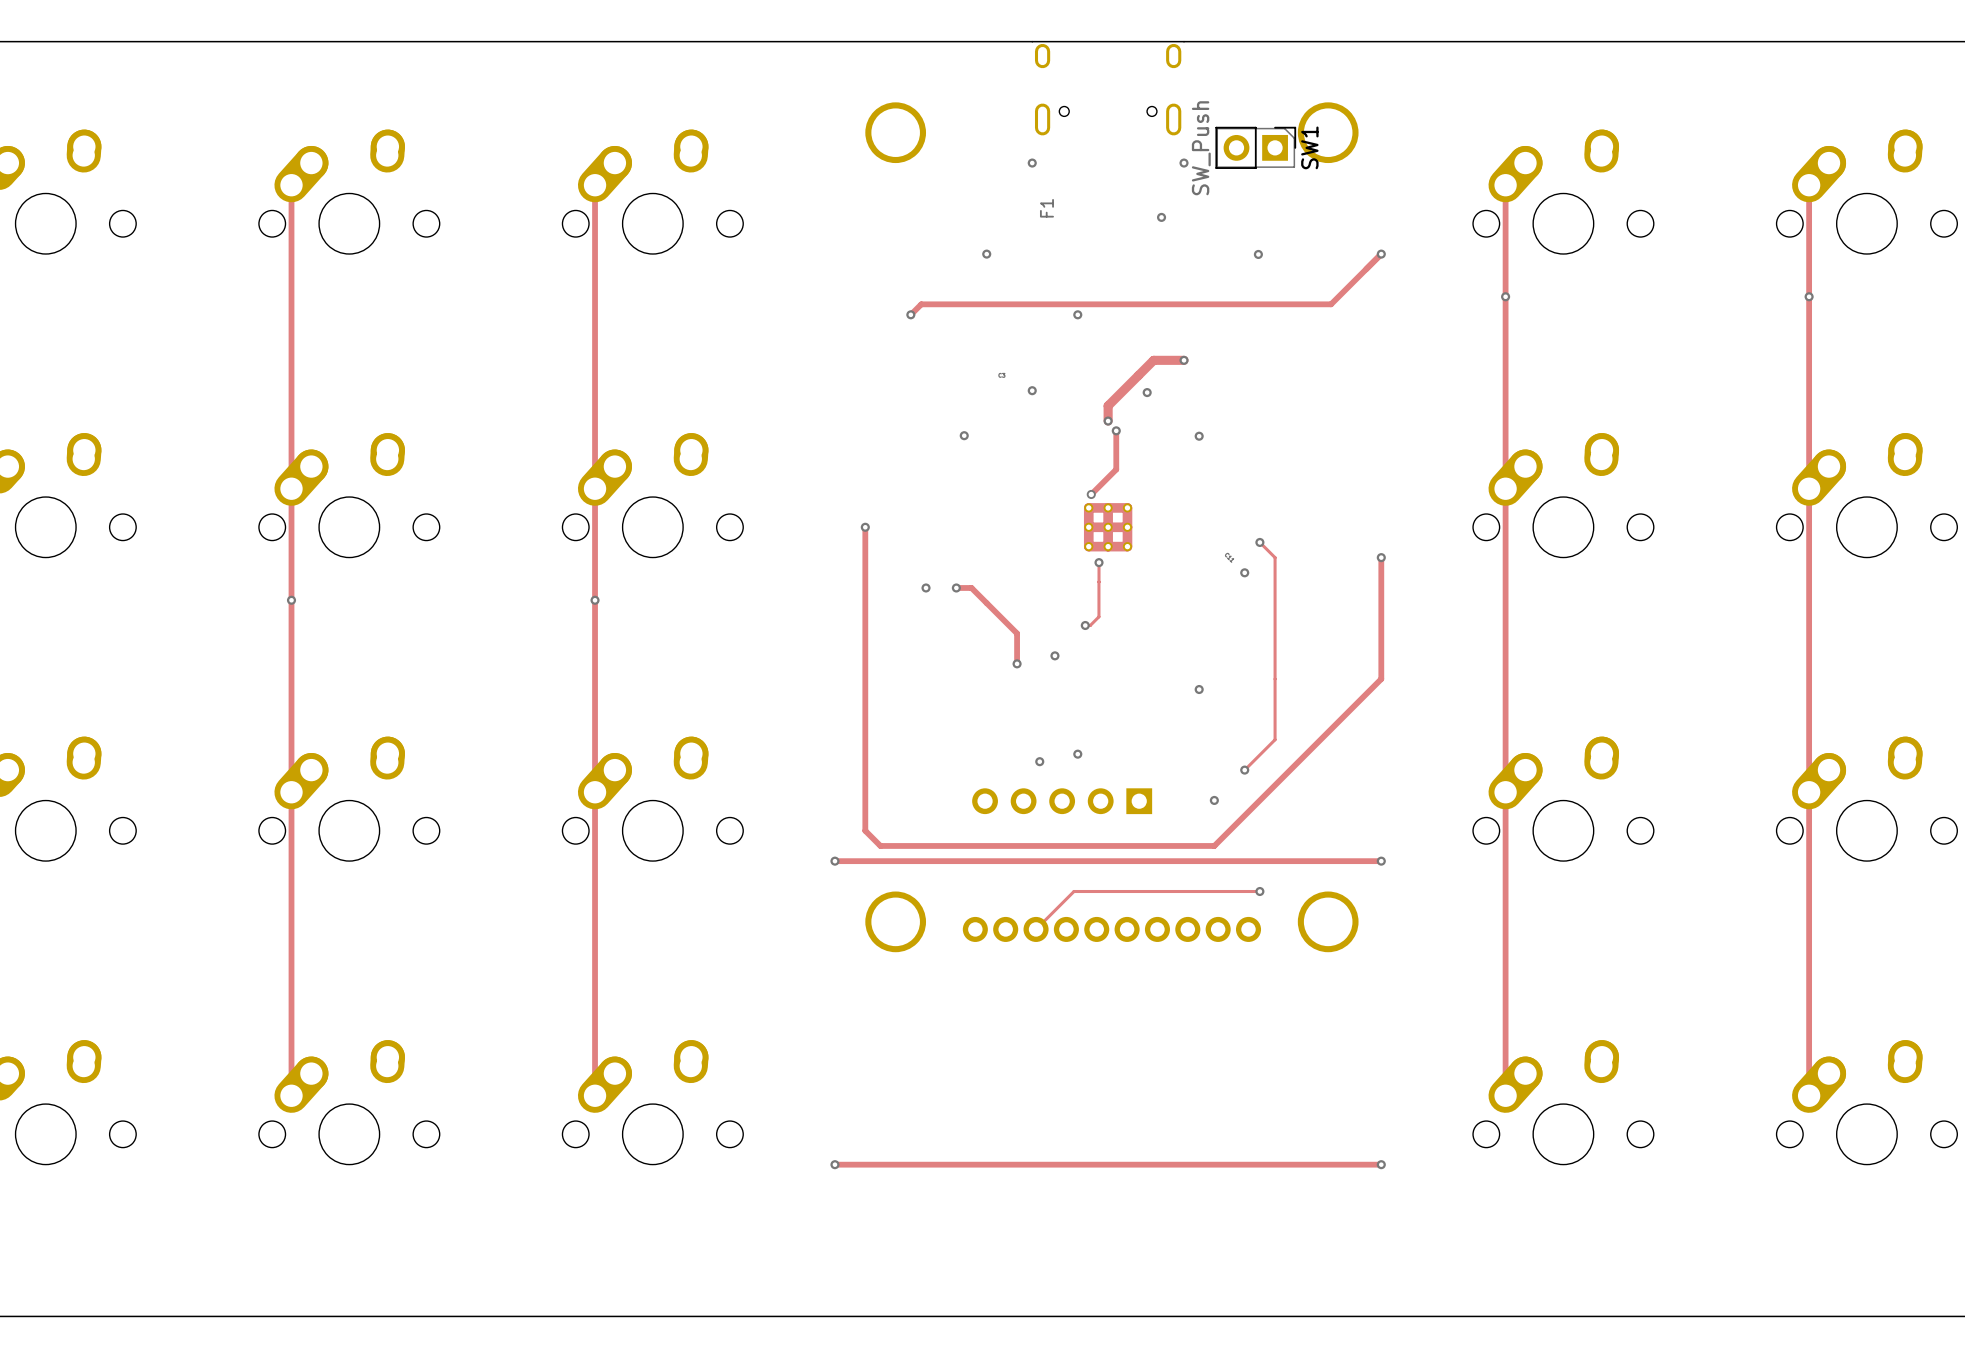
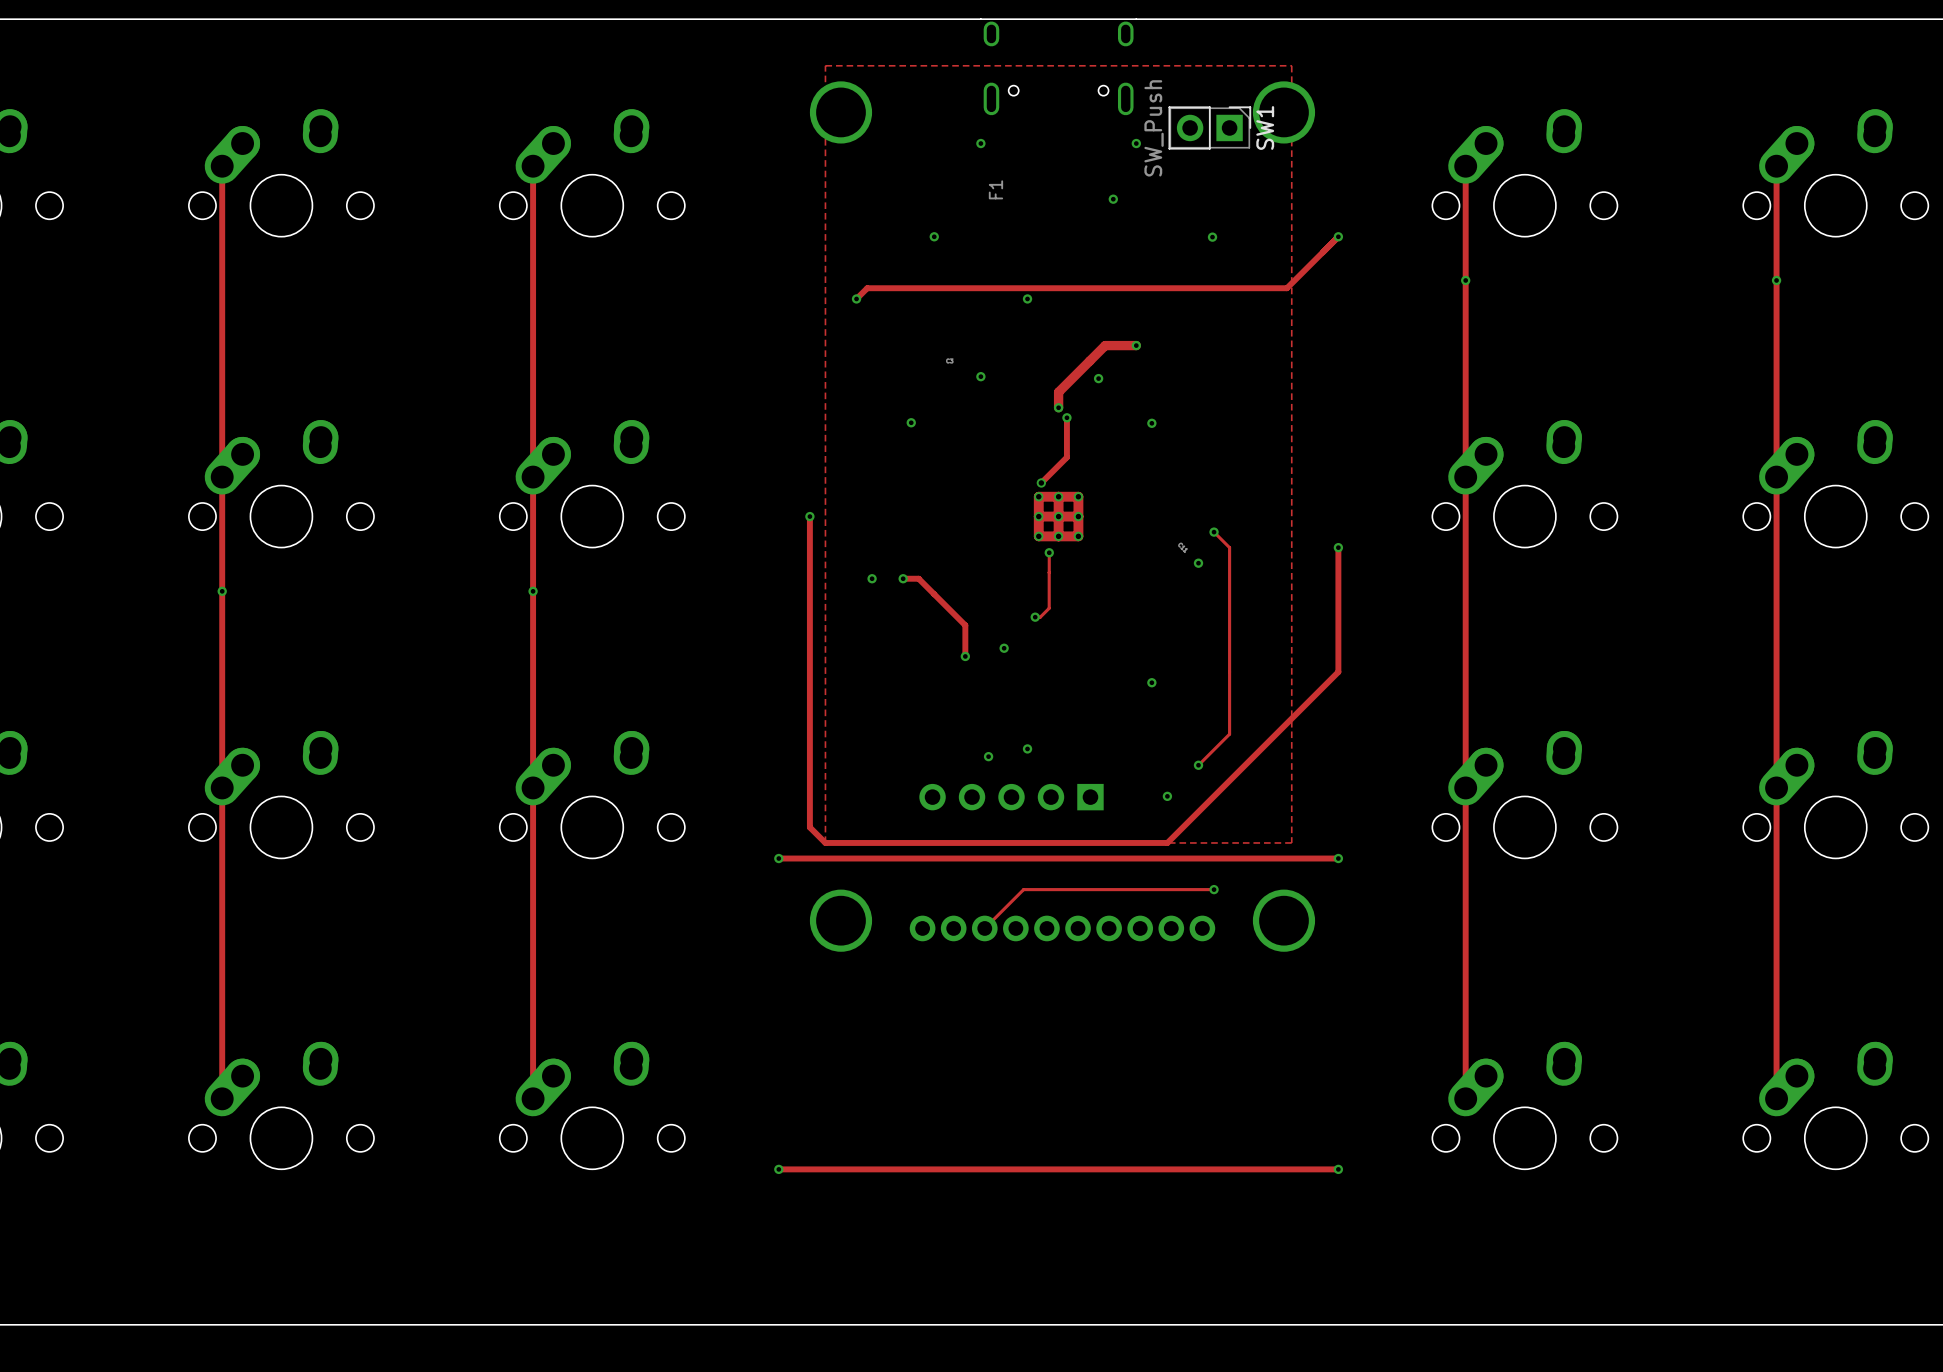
zone outline: none -> (825, 65) (825, 842) (1291, 842) (1291, 65) (825, 65)

